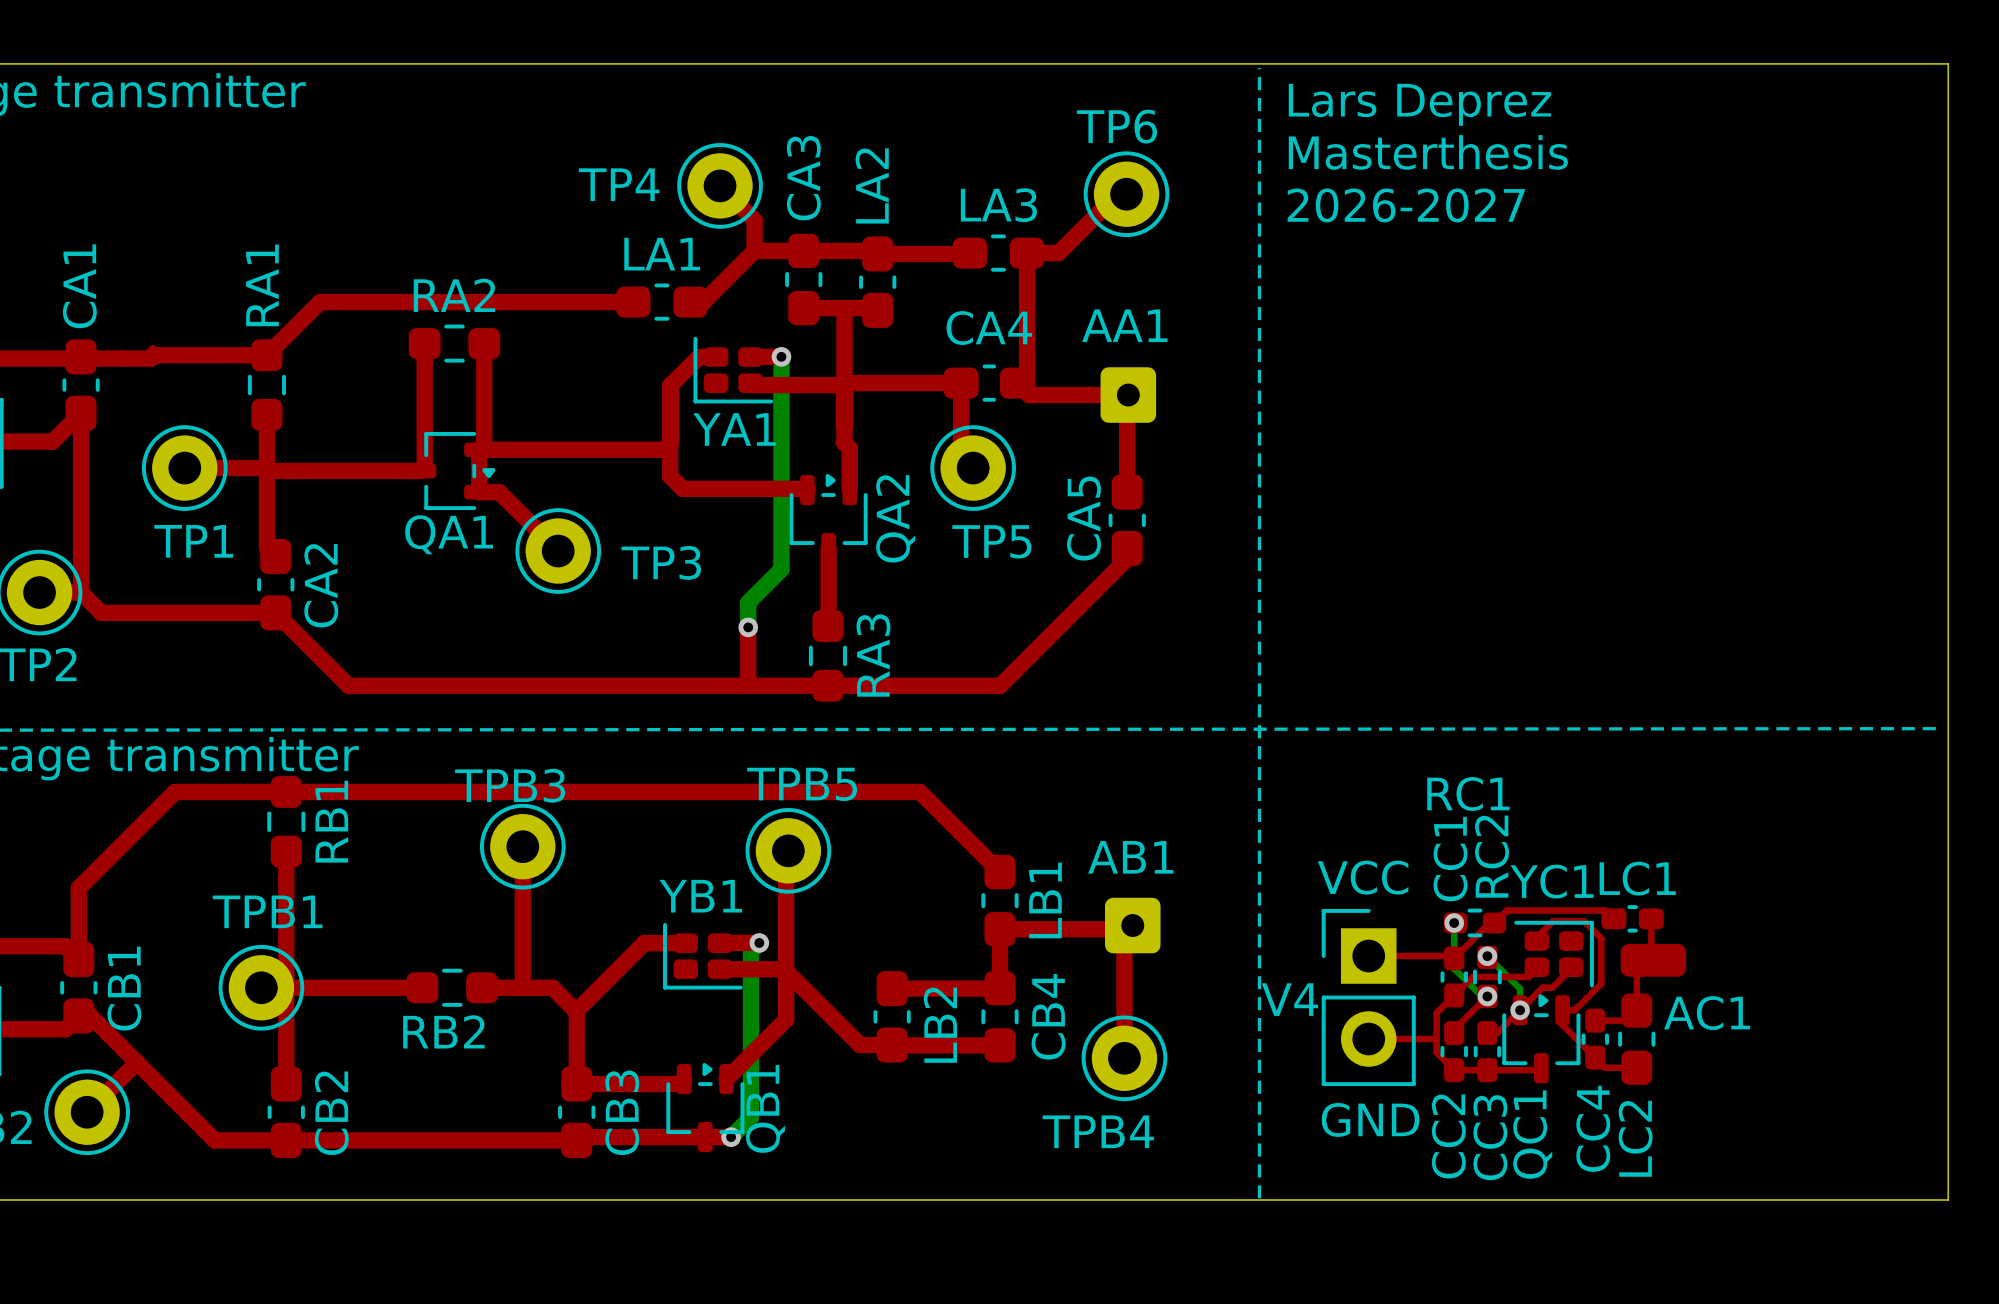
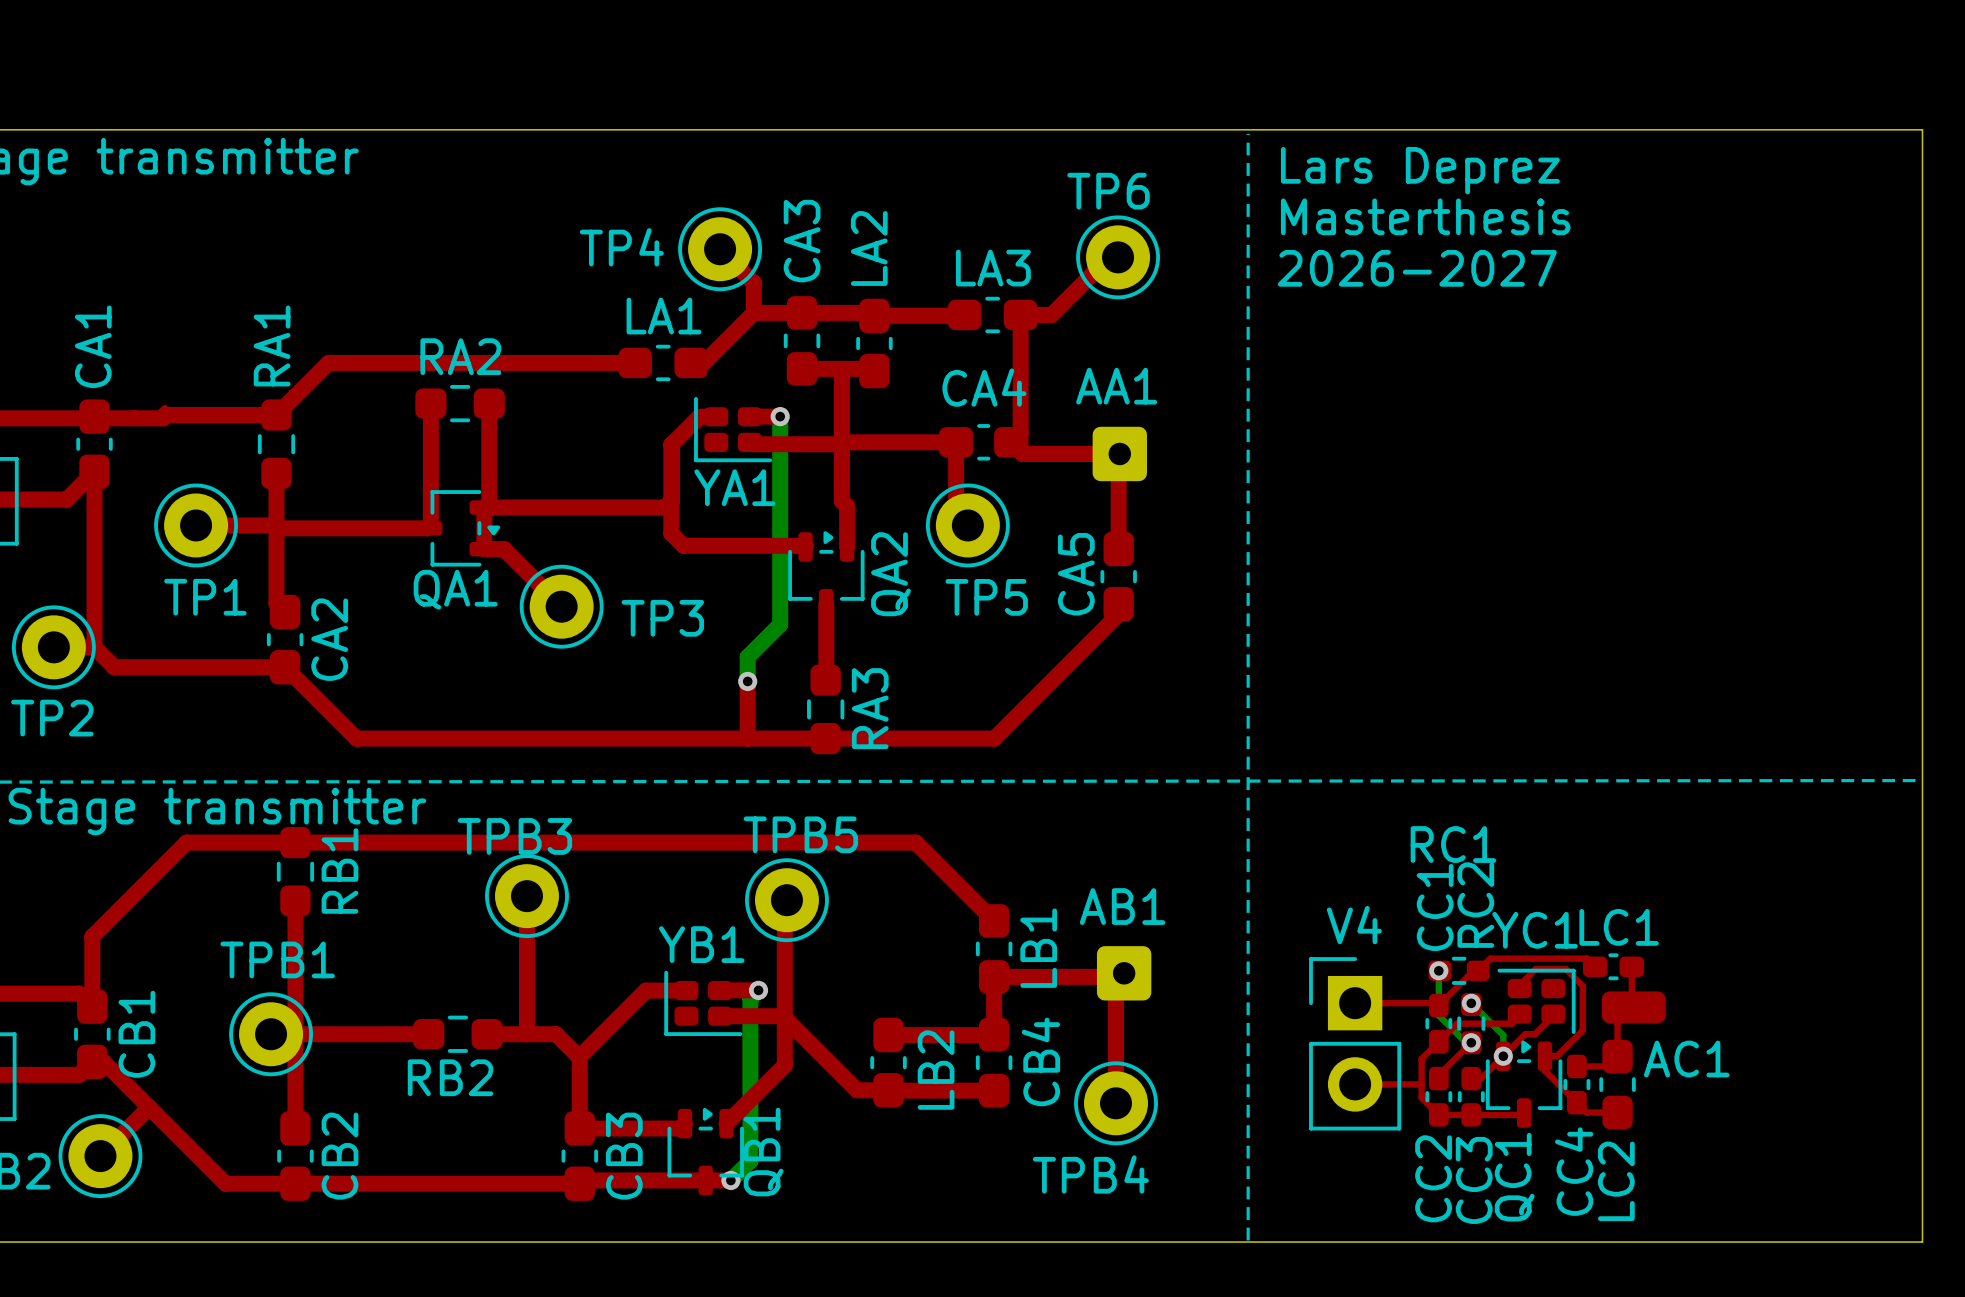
text: VCC (1363, 877) -> none
V4 name position: V4 (1289, 999) -> V4 (1354, 925)
text: GND (1370, 1119) -> none

